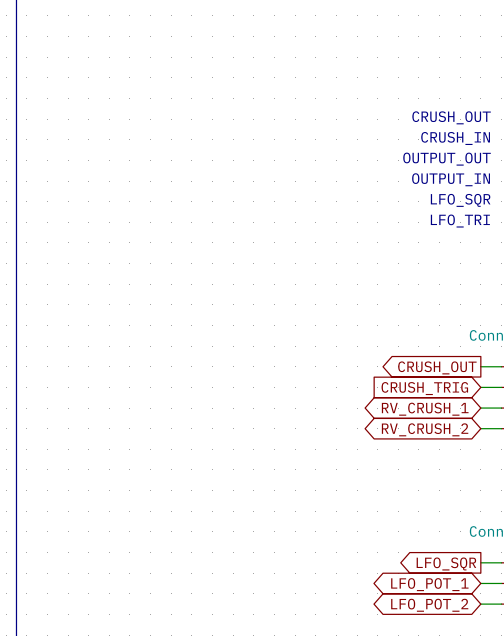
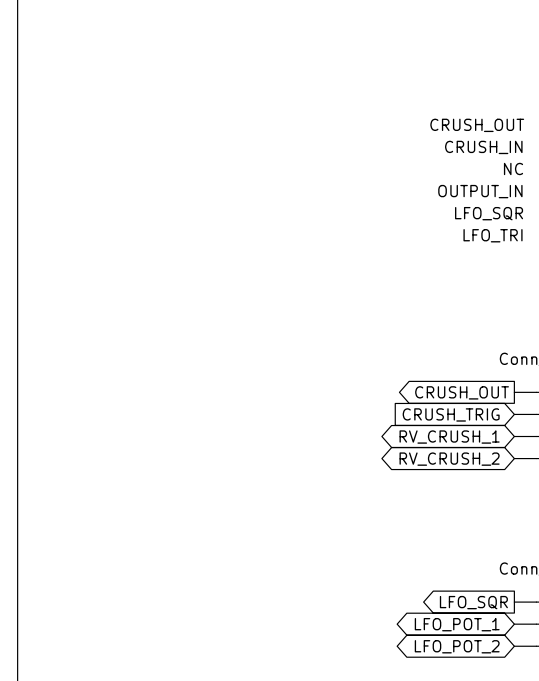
text: OUTPUT_OUT (447, 159) -> NC (513, 168)

